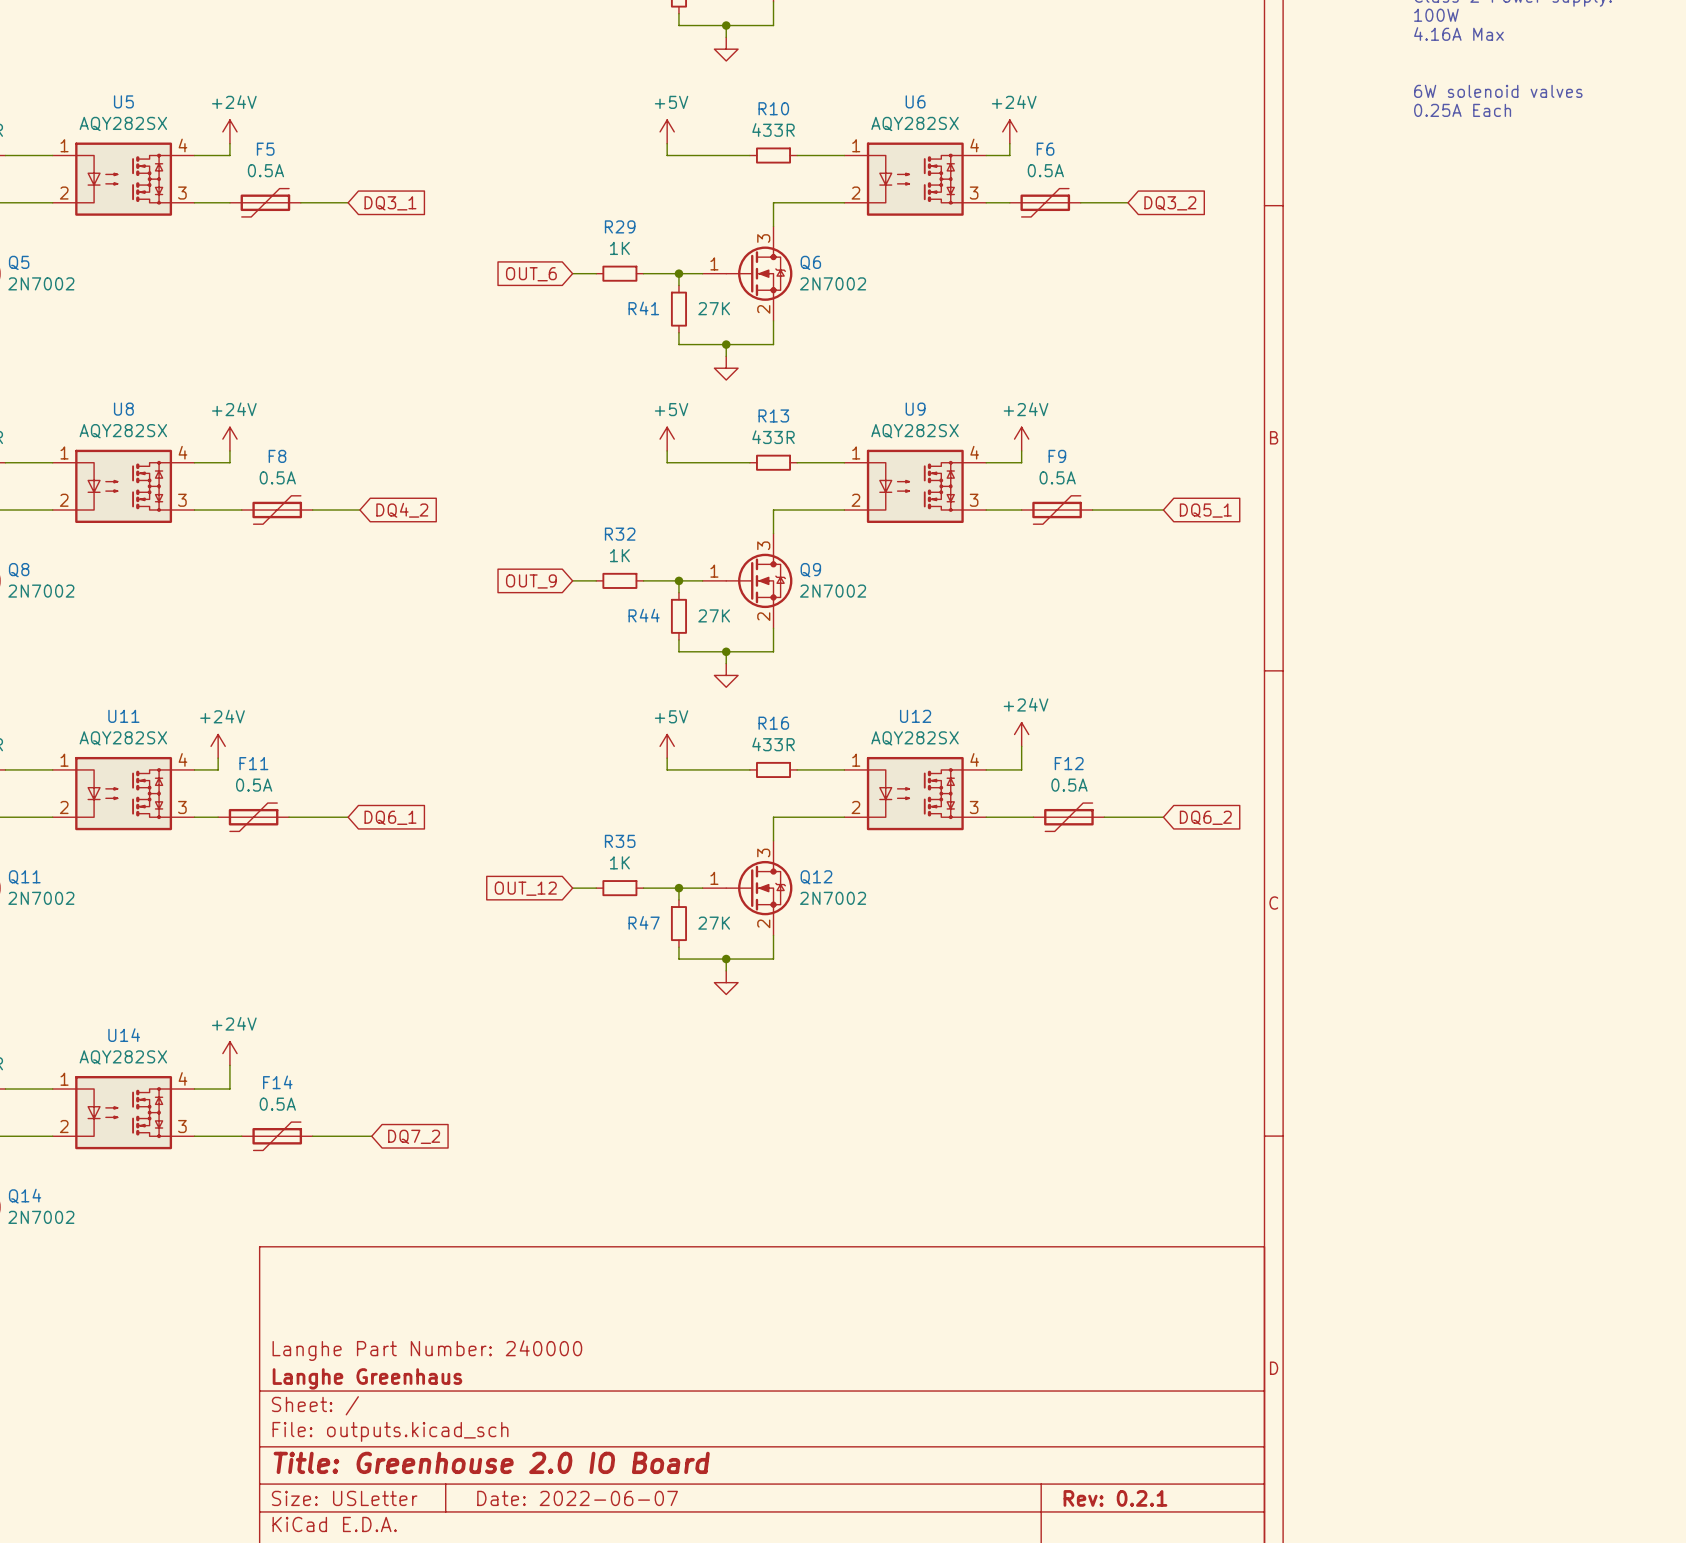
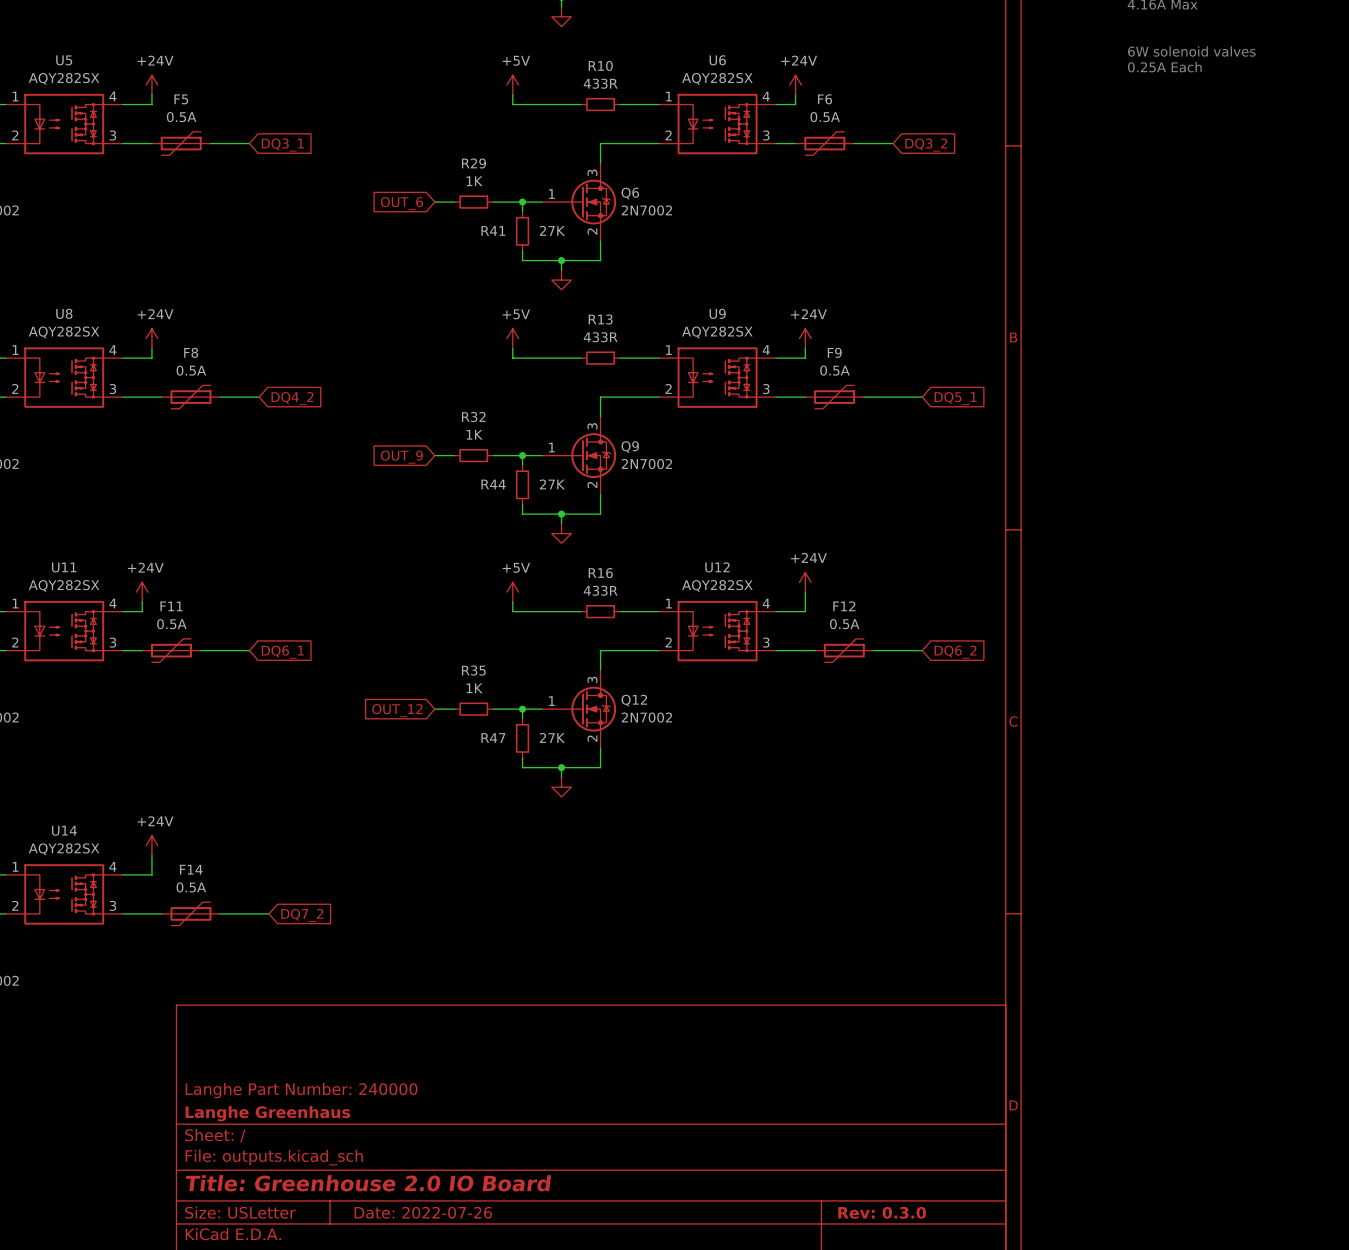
title block: Date: 2022-06-07 (577, 1498) -> Date: 2022-07-26 (423, 1212)
title block: Rev: 0.2.1 (1115, 1498) -> Rev: 0.3.0 (882, 1212)

